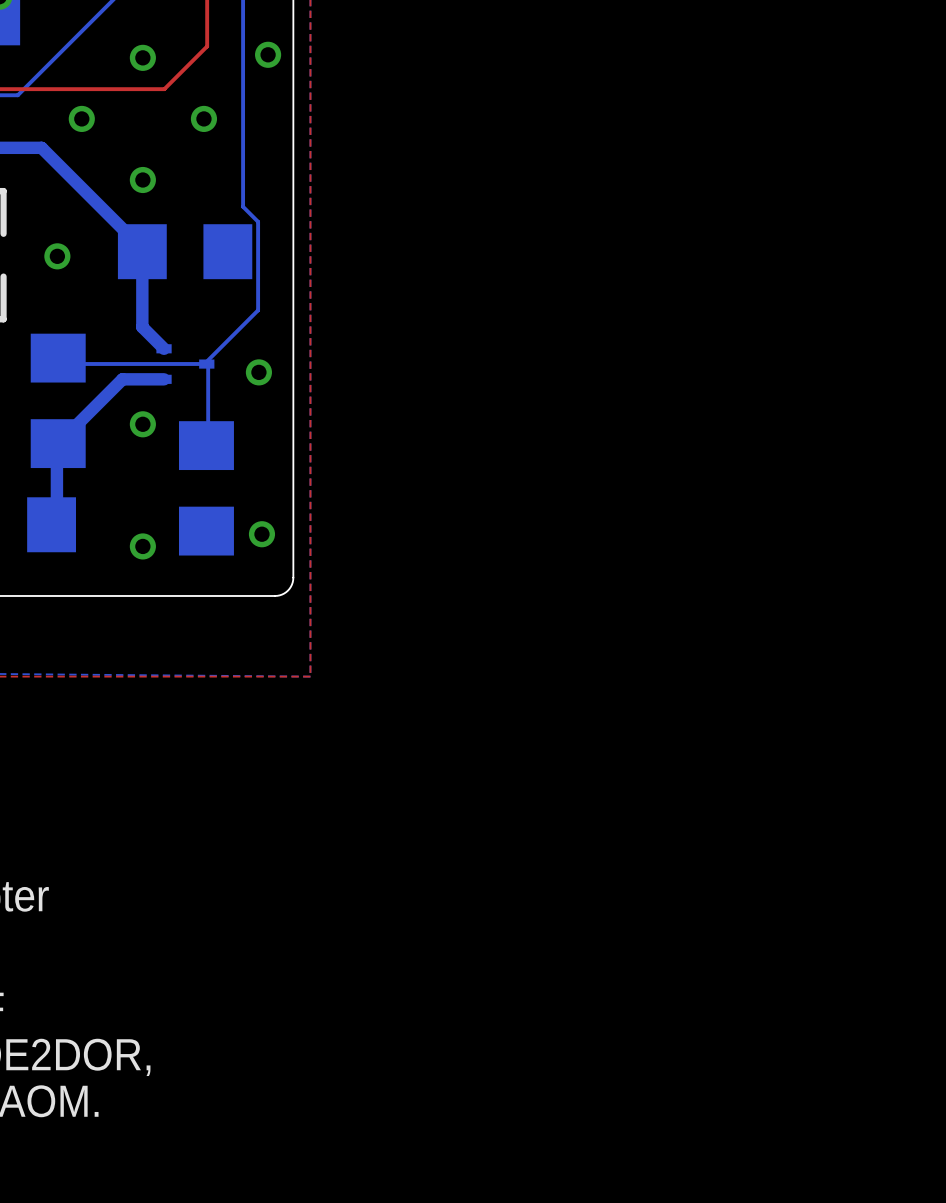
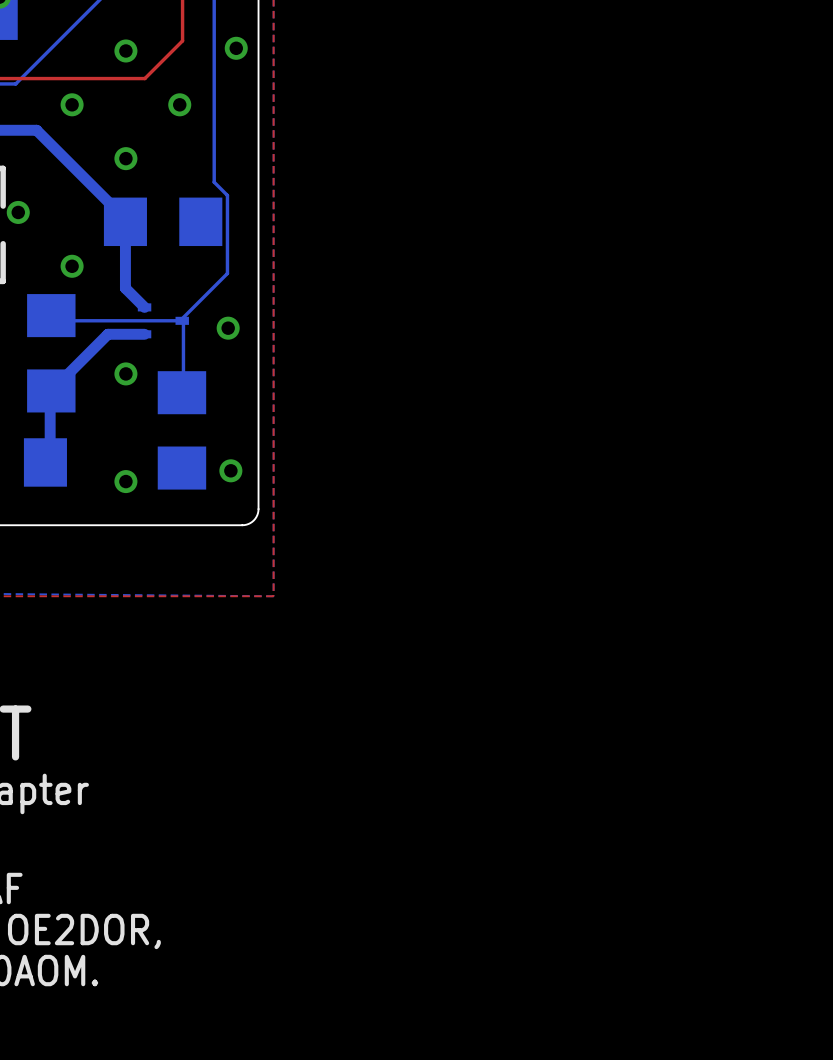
via: none -> (18, 212)
via: (57, 256) -> none
via: none -> (72, 266)

